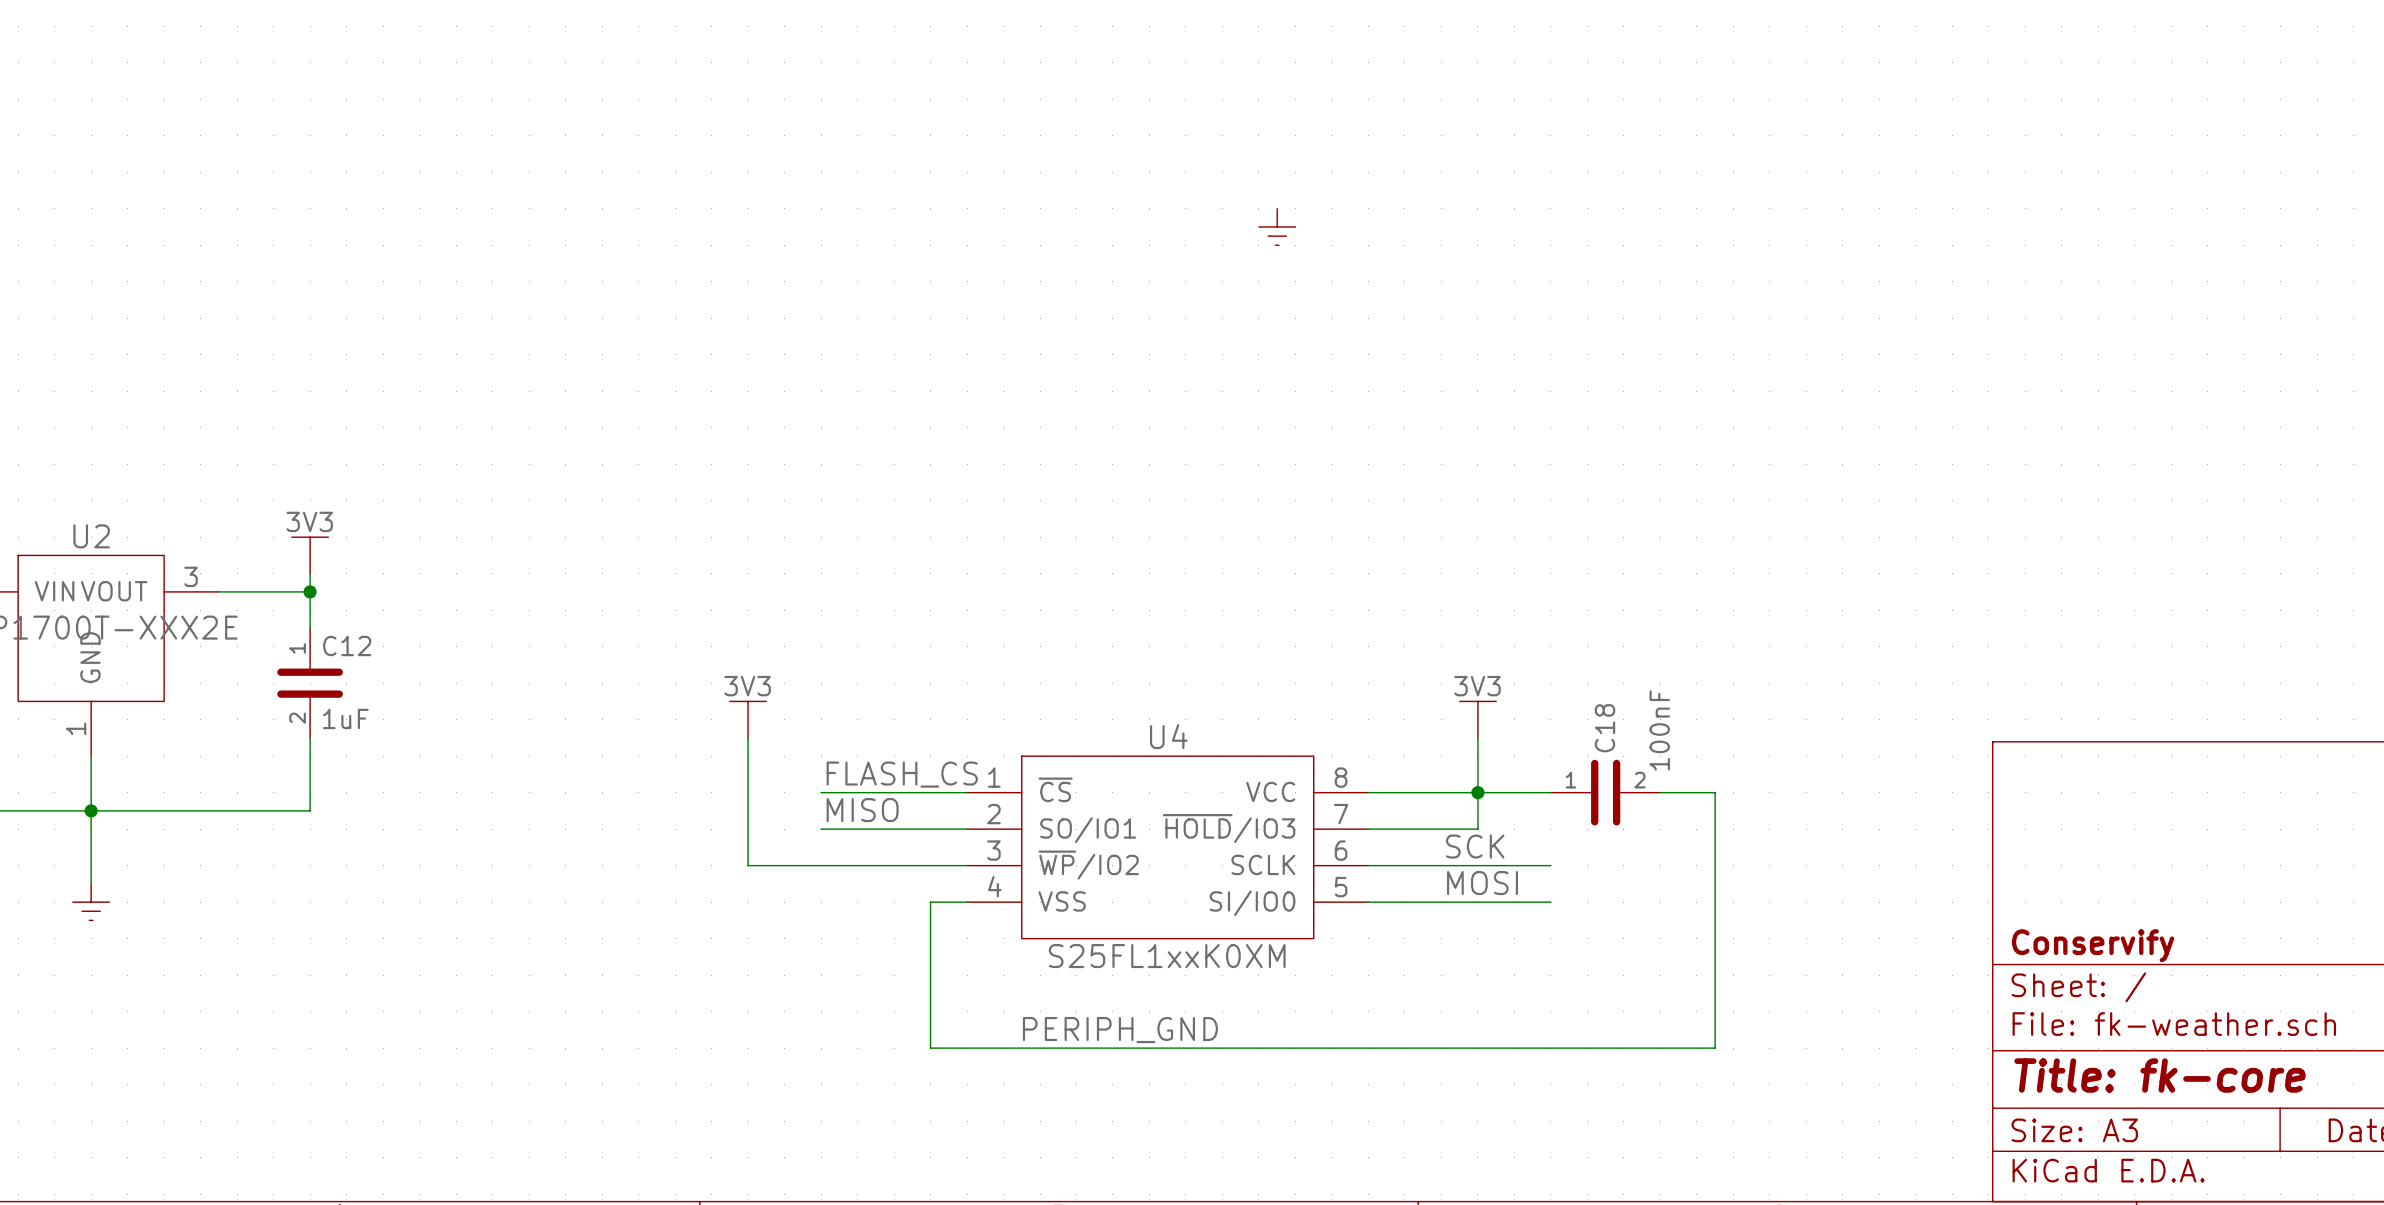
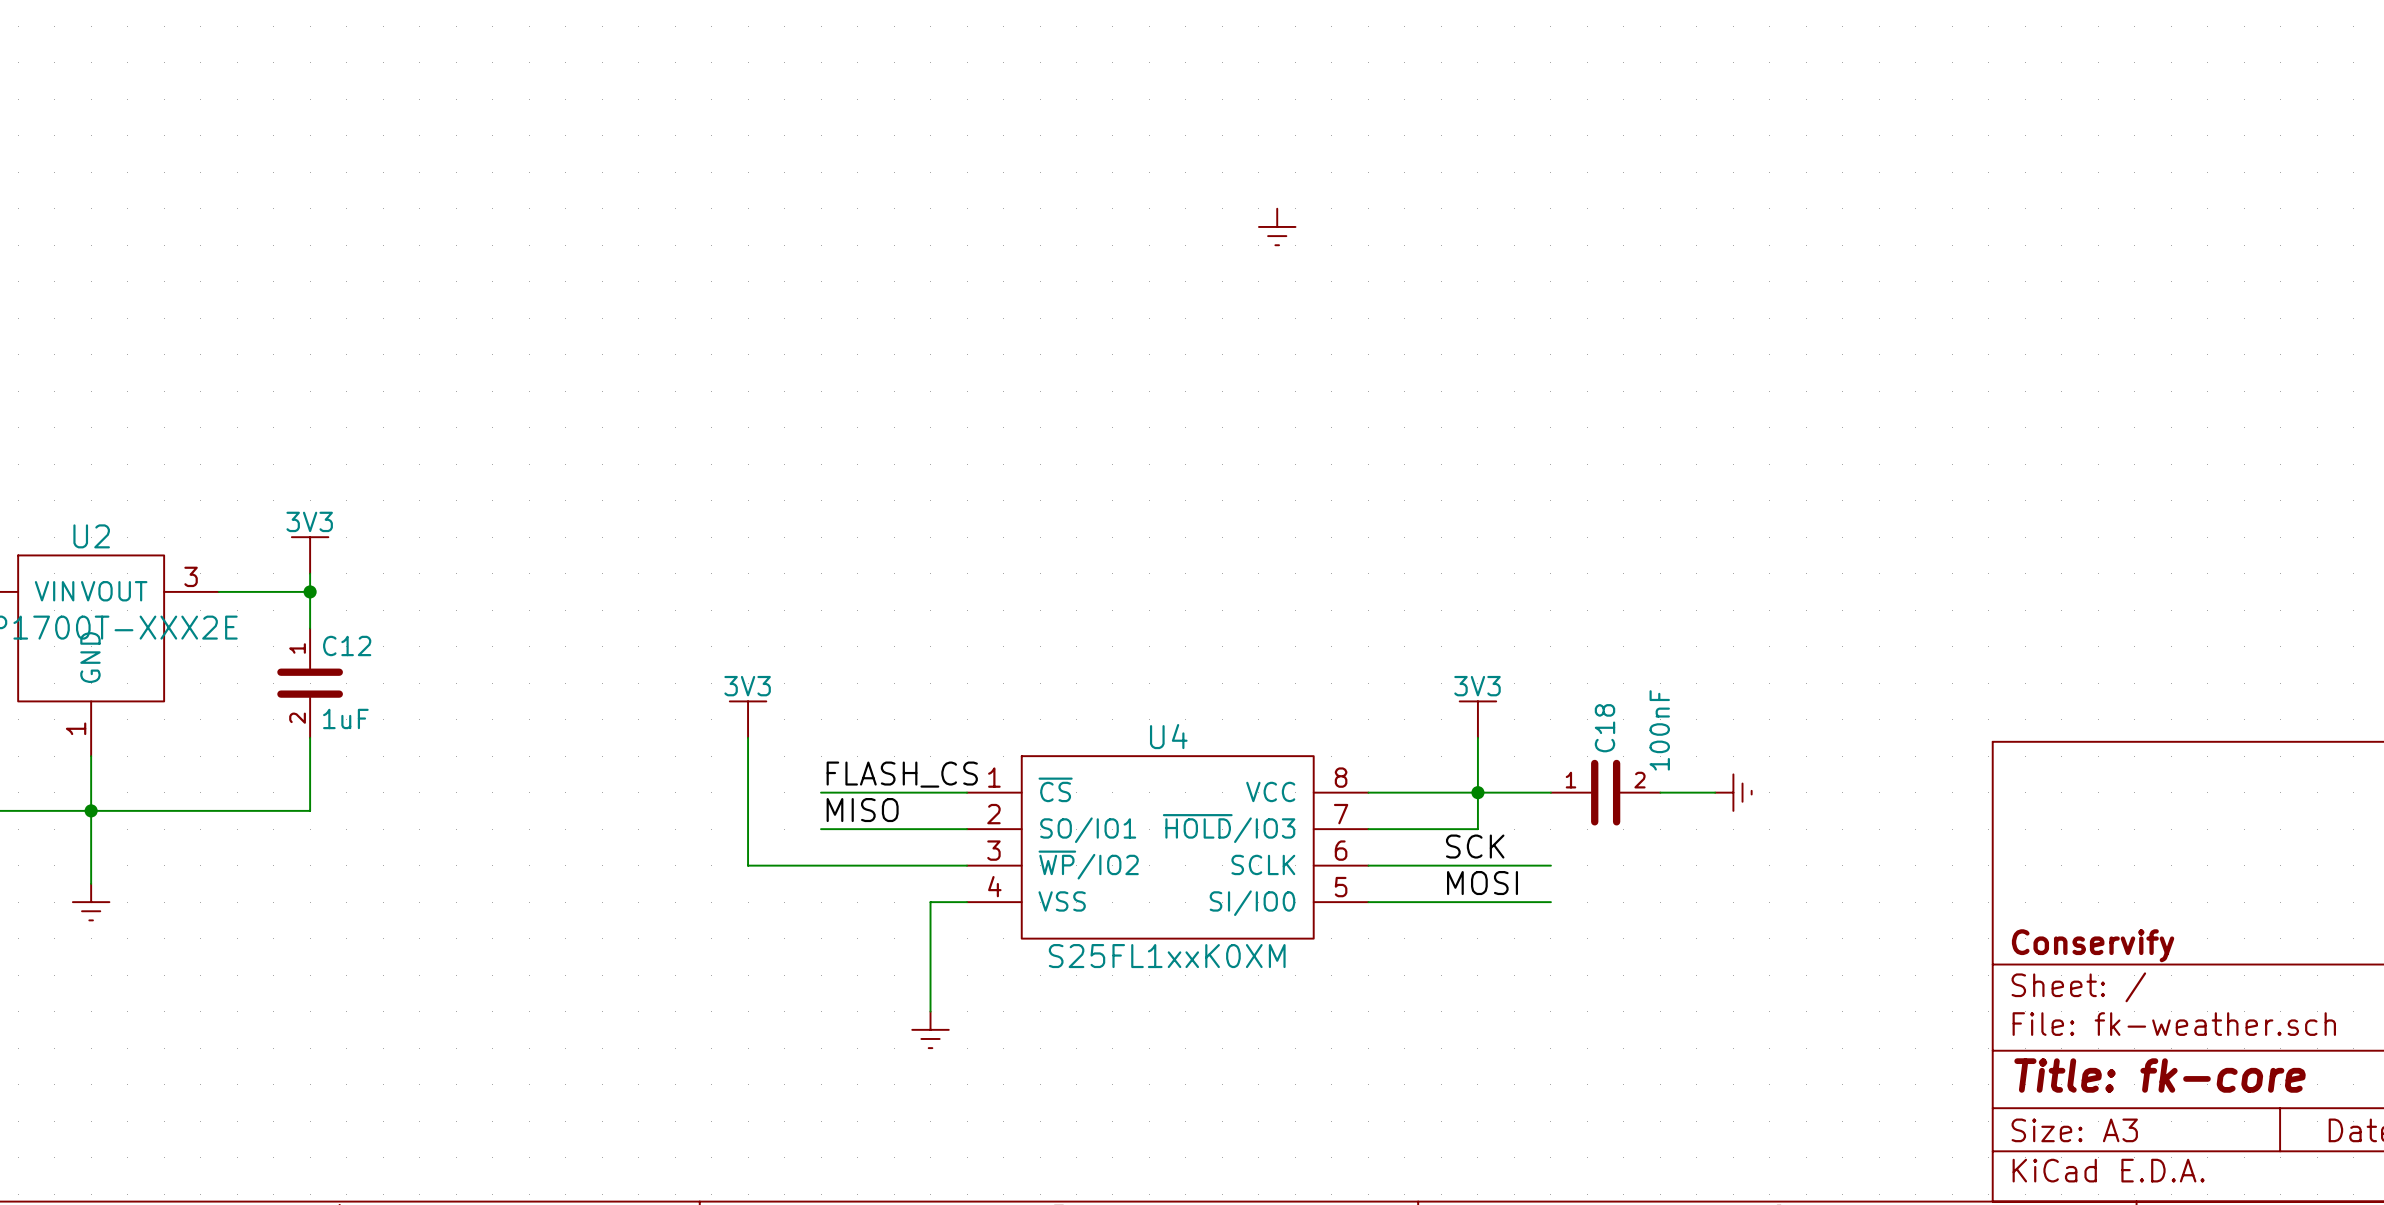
wire: (1715, 792) (1715, 1048) (930, 1048) (930, 1011) -> none
power symbol: none -> (1733, 792)
power symbol: none -> (930, 1029)
label: PERIPH_GND (1120, 1030) -> none

